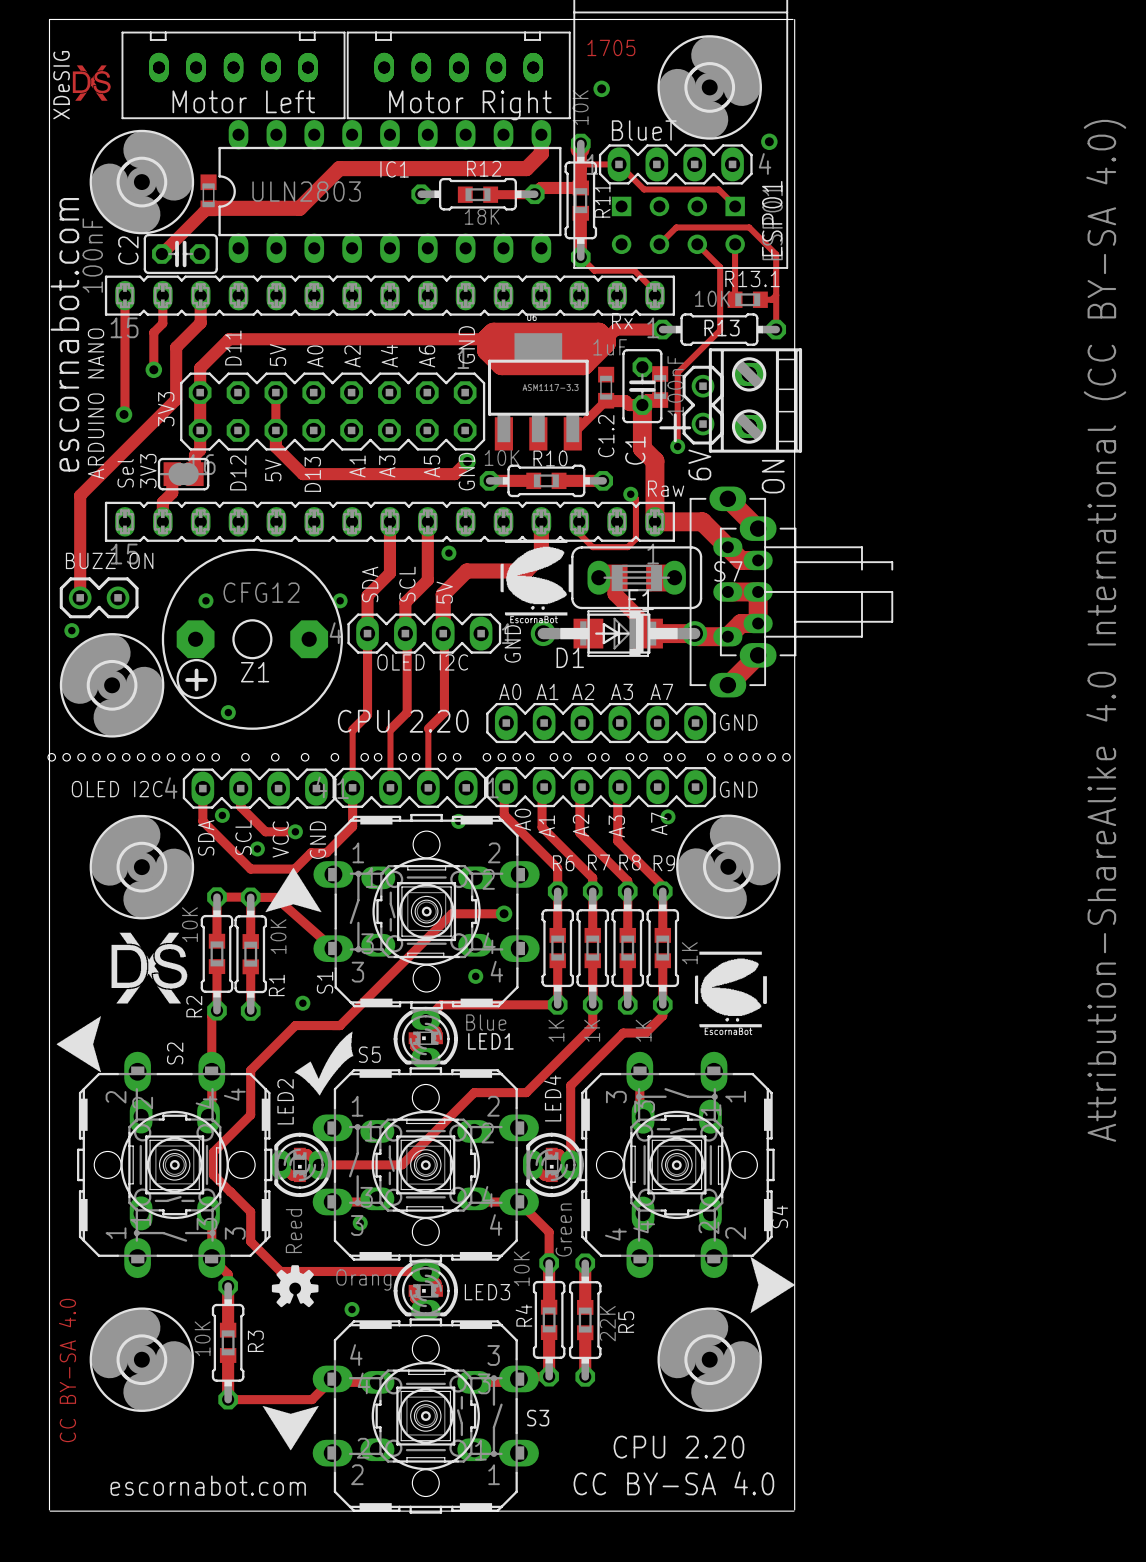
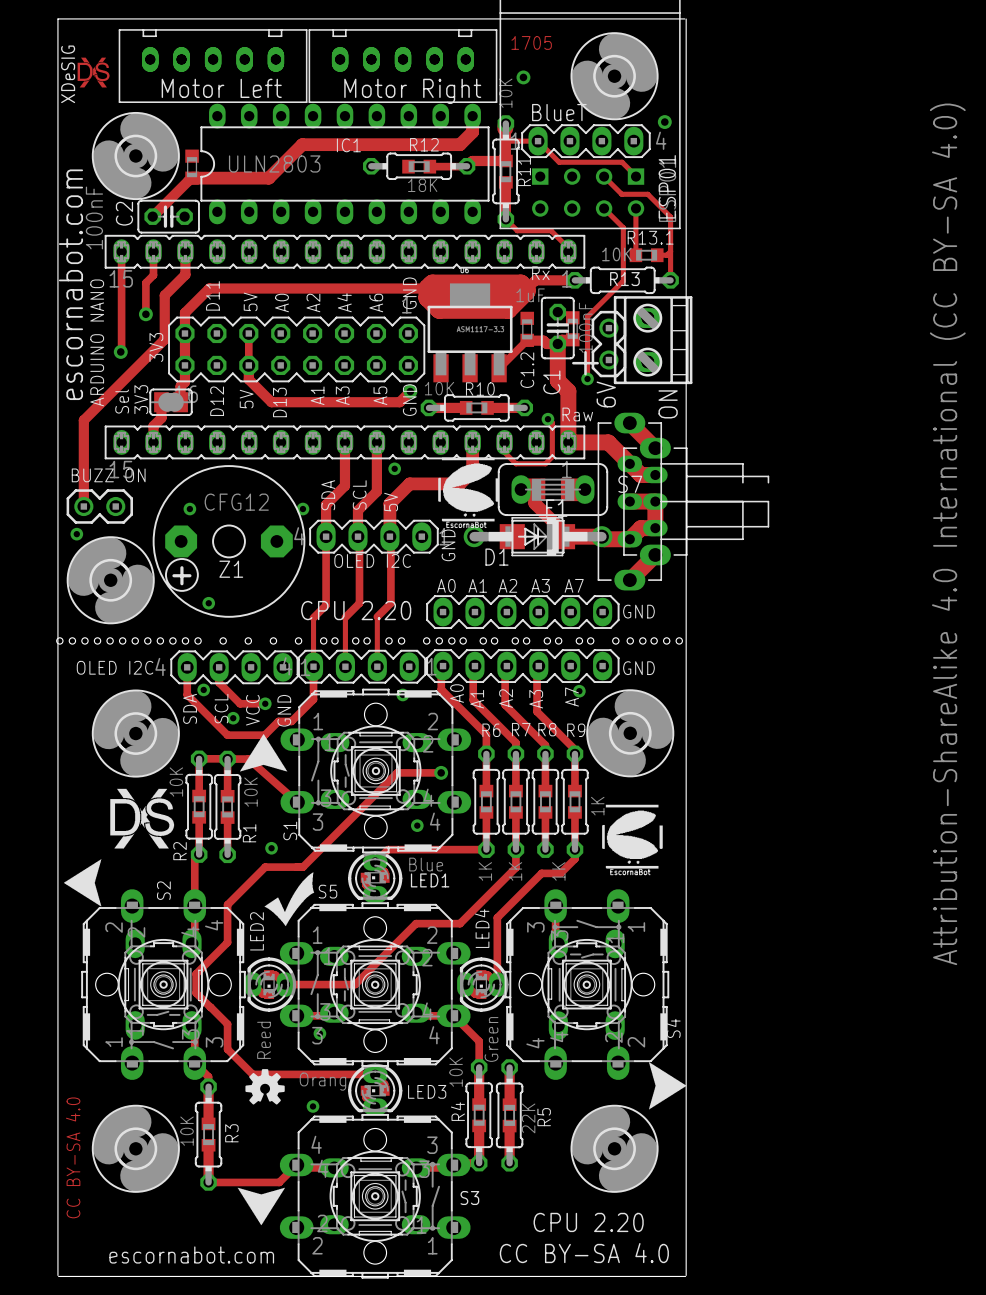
track: (718, 227) (676, 227) (659, 244) -> (621, 194) (604, 176)

